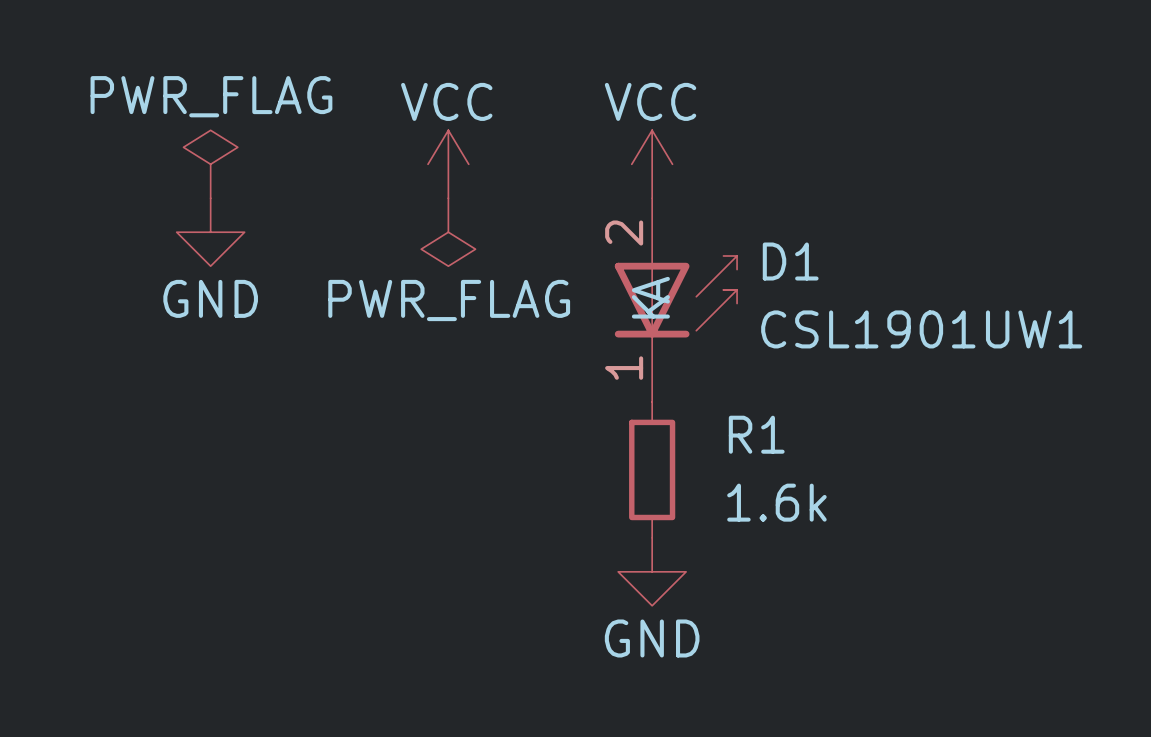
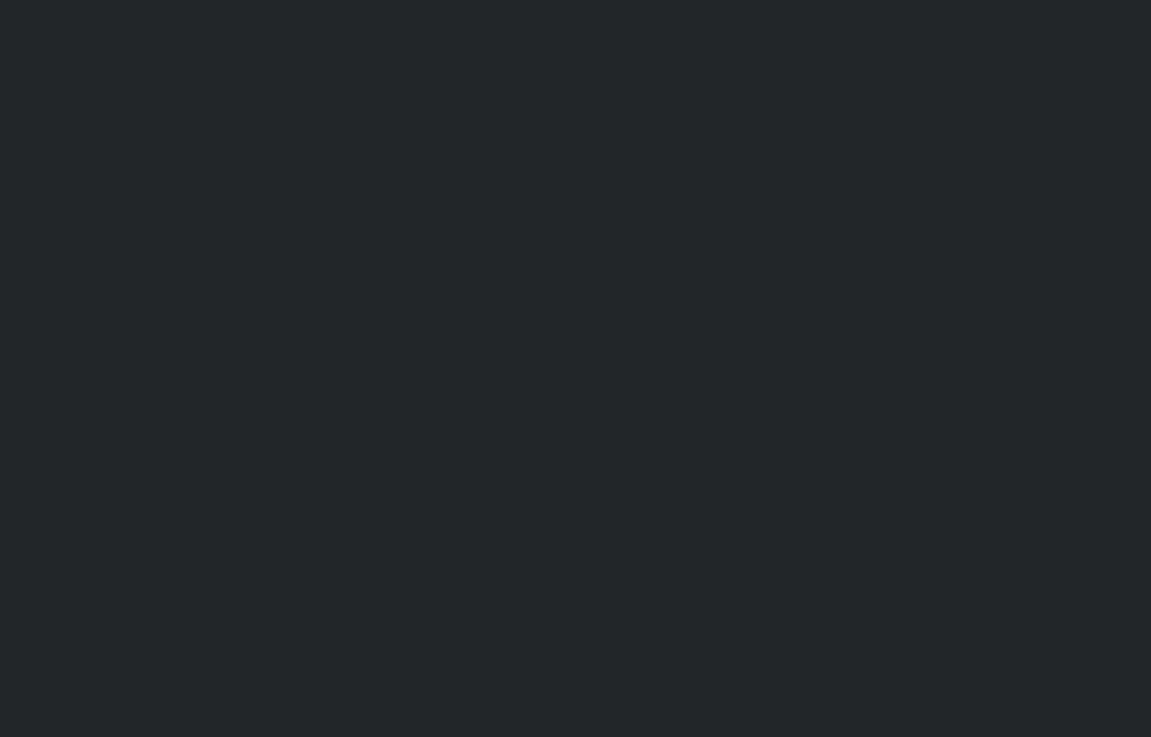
power symbol: PWR_FLAG (210, 164) -> none
power symbol: VCC (448, 164) -> none
power symbol: VCC (652, 164) -> none
power symbol: GND (210, 232) -> none
power symbol: PWR_FLAG (448, 232) -> none
D1: CSL1901UW1 (675, 300) -> none
R1: 1.6k (652, 469) -> none
power symbol: GND (652, 571) -> none

